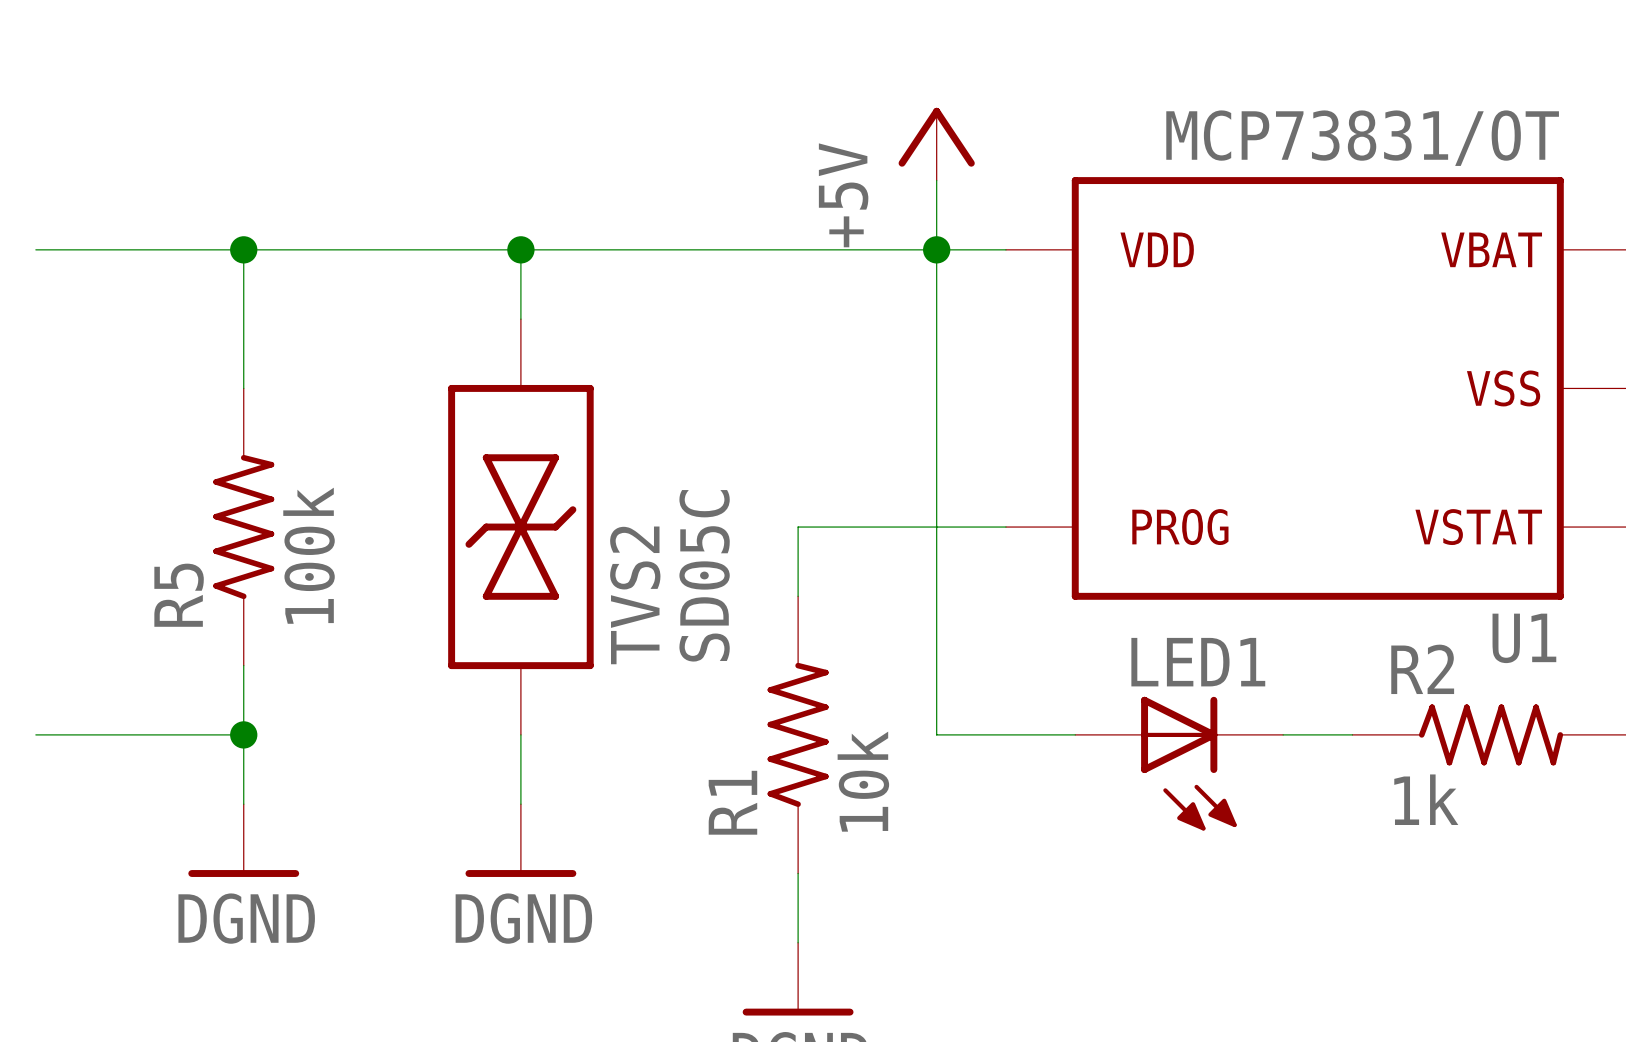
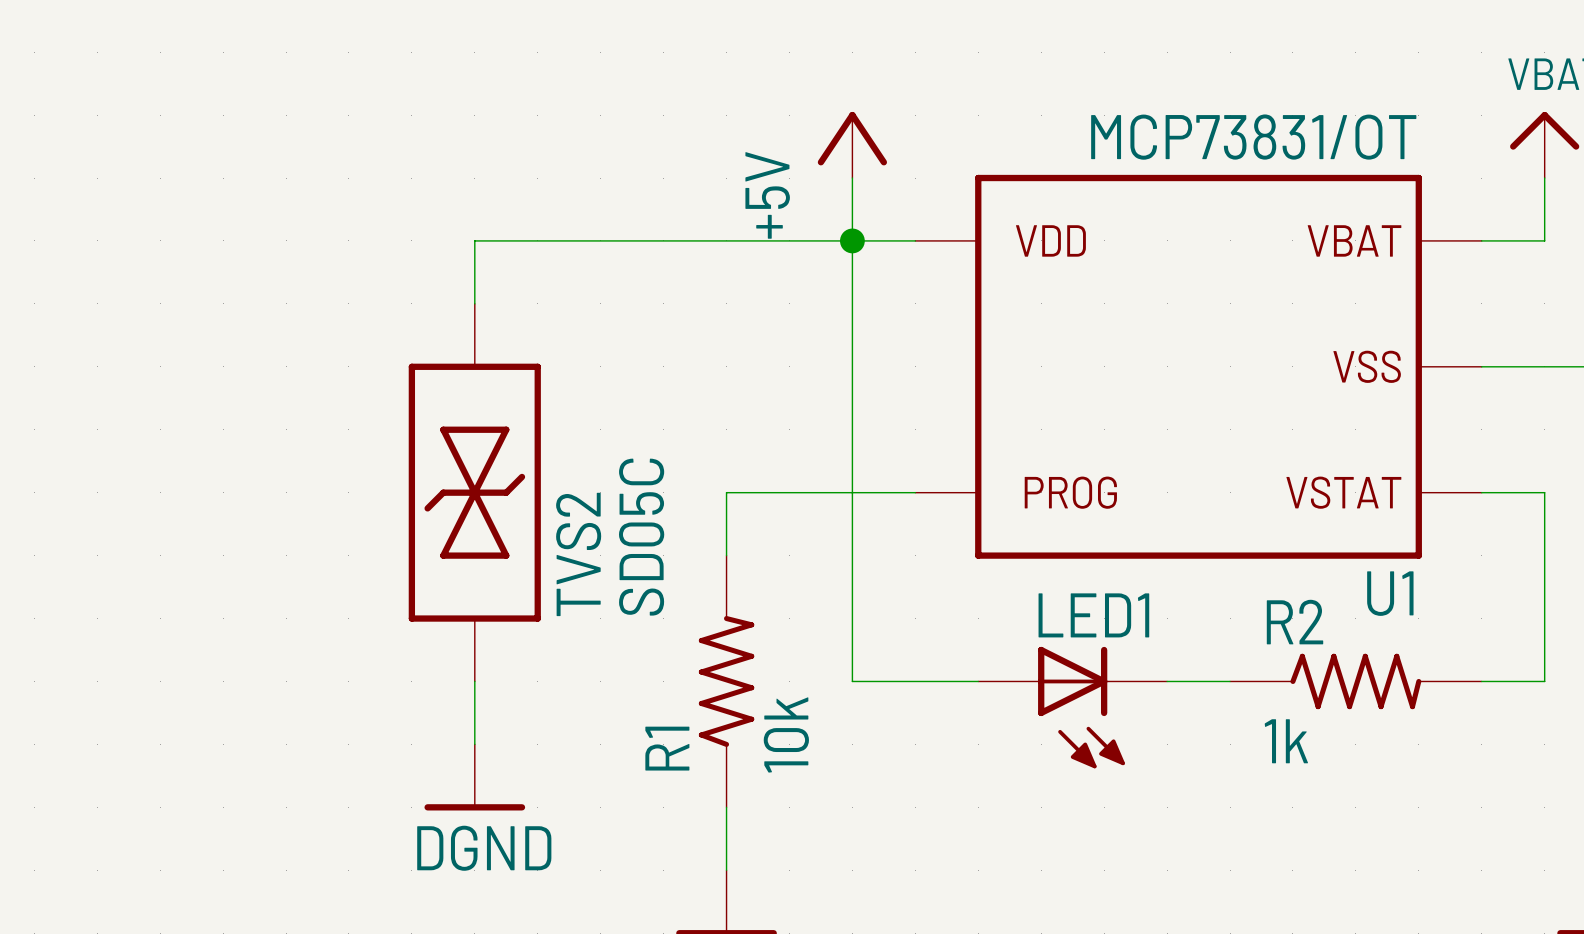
wire: (35, 249) (520, 249) -> none
wire: (243, 249) (243, 388) -> none
junction: (243, 249) -> none
junction: (520, 249) -> none
R5: 100k (243, 527) -> none
wire: (243, 665) (243, 804) -> none
wire: (35, 734) (243, 734) -> none
junction: (243, 734) -> none
power symbol: DGND (243, 840) -> none

